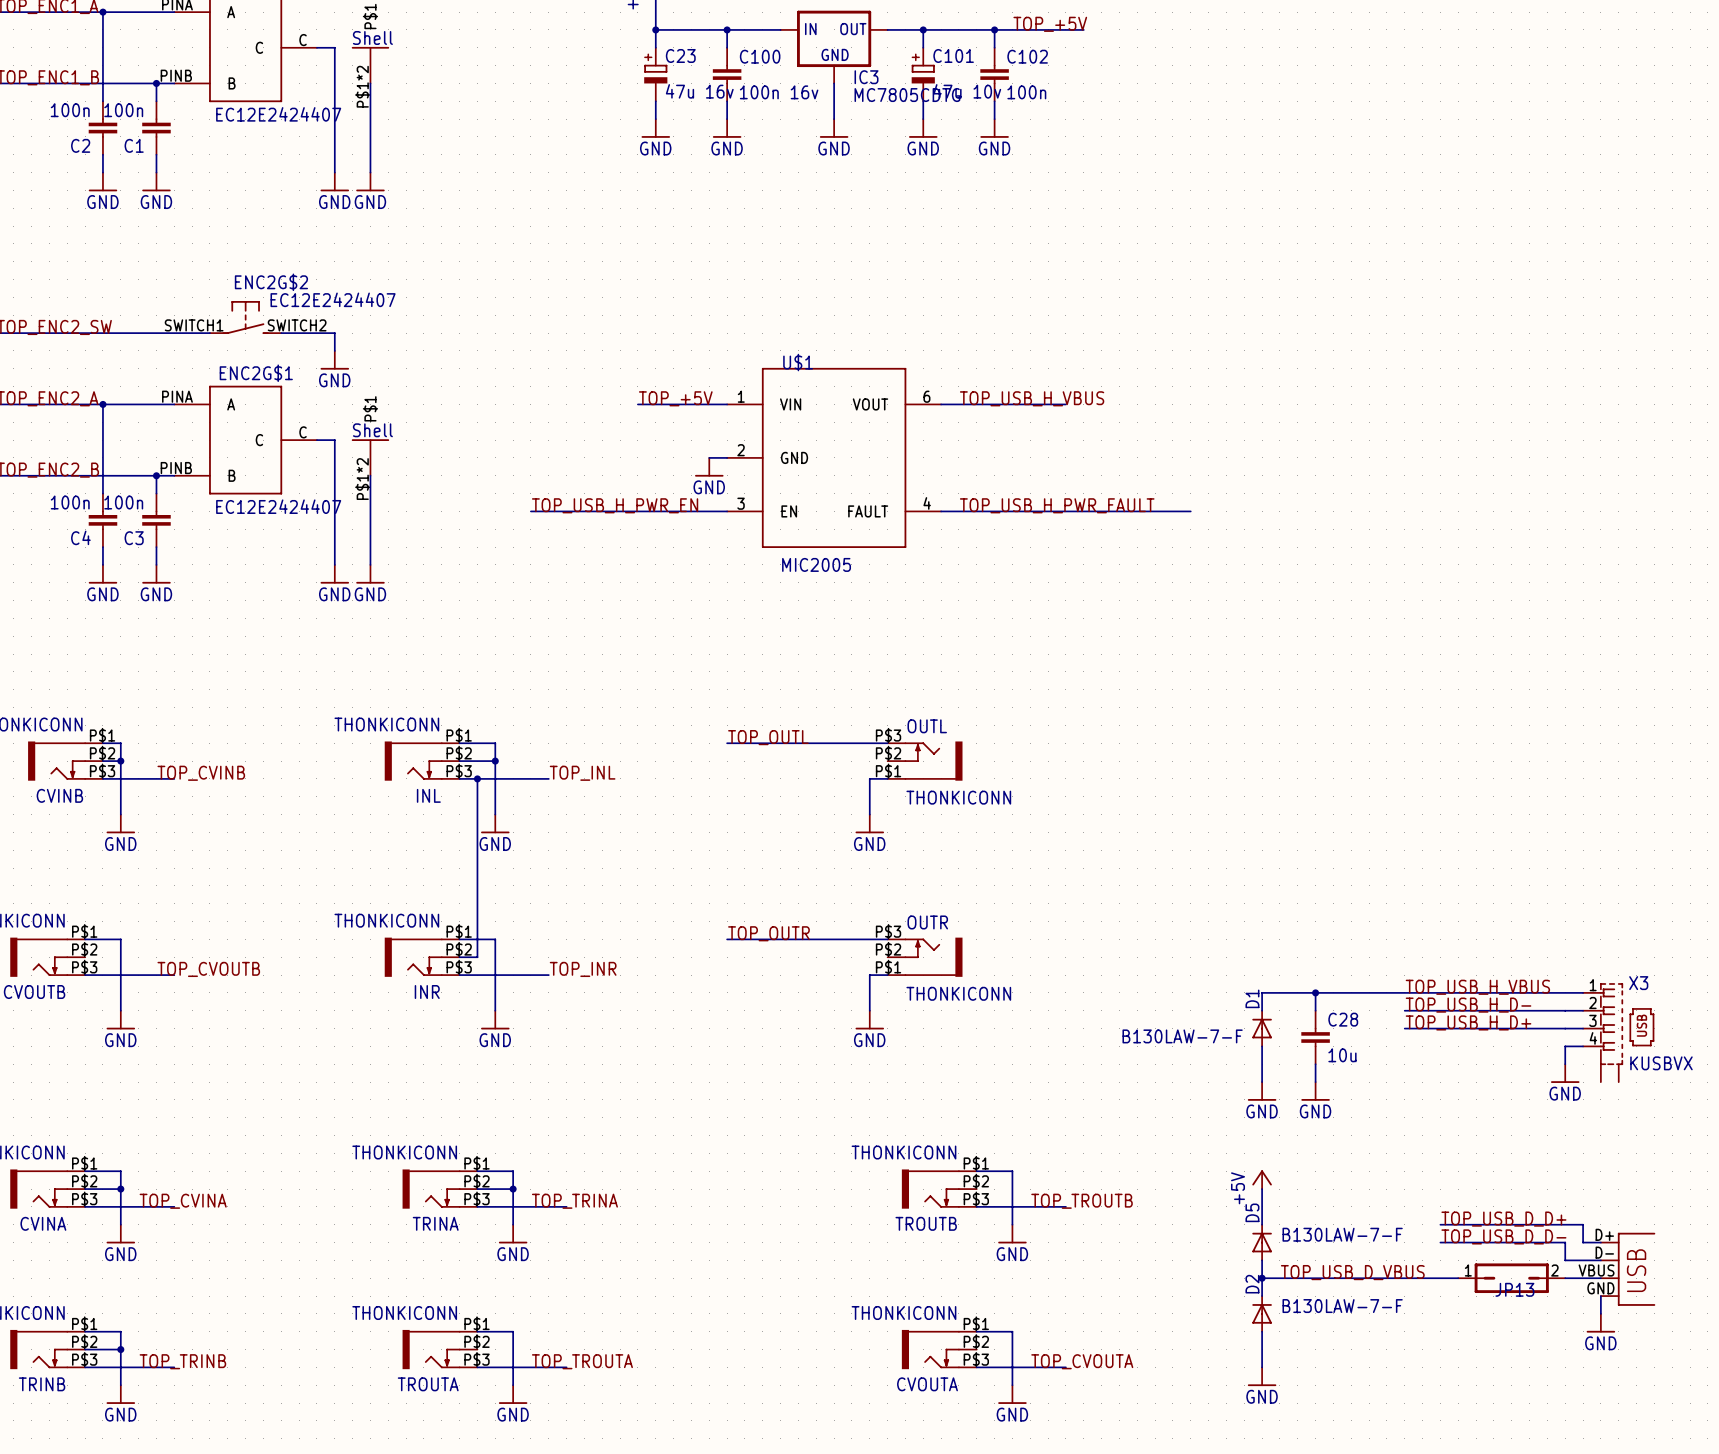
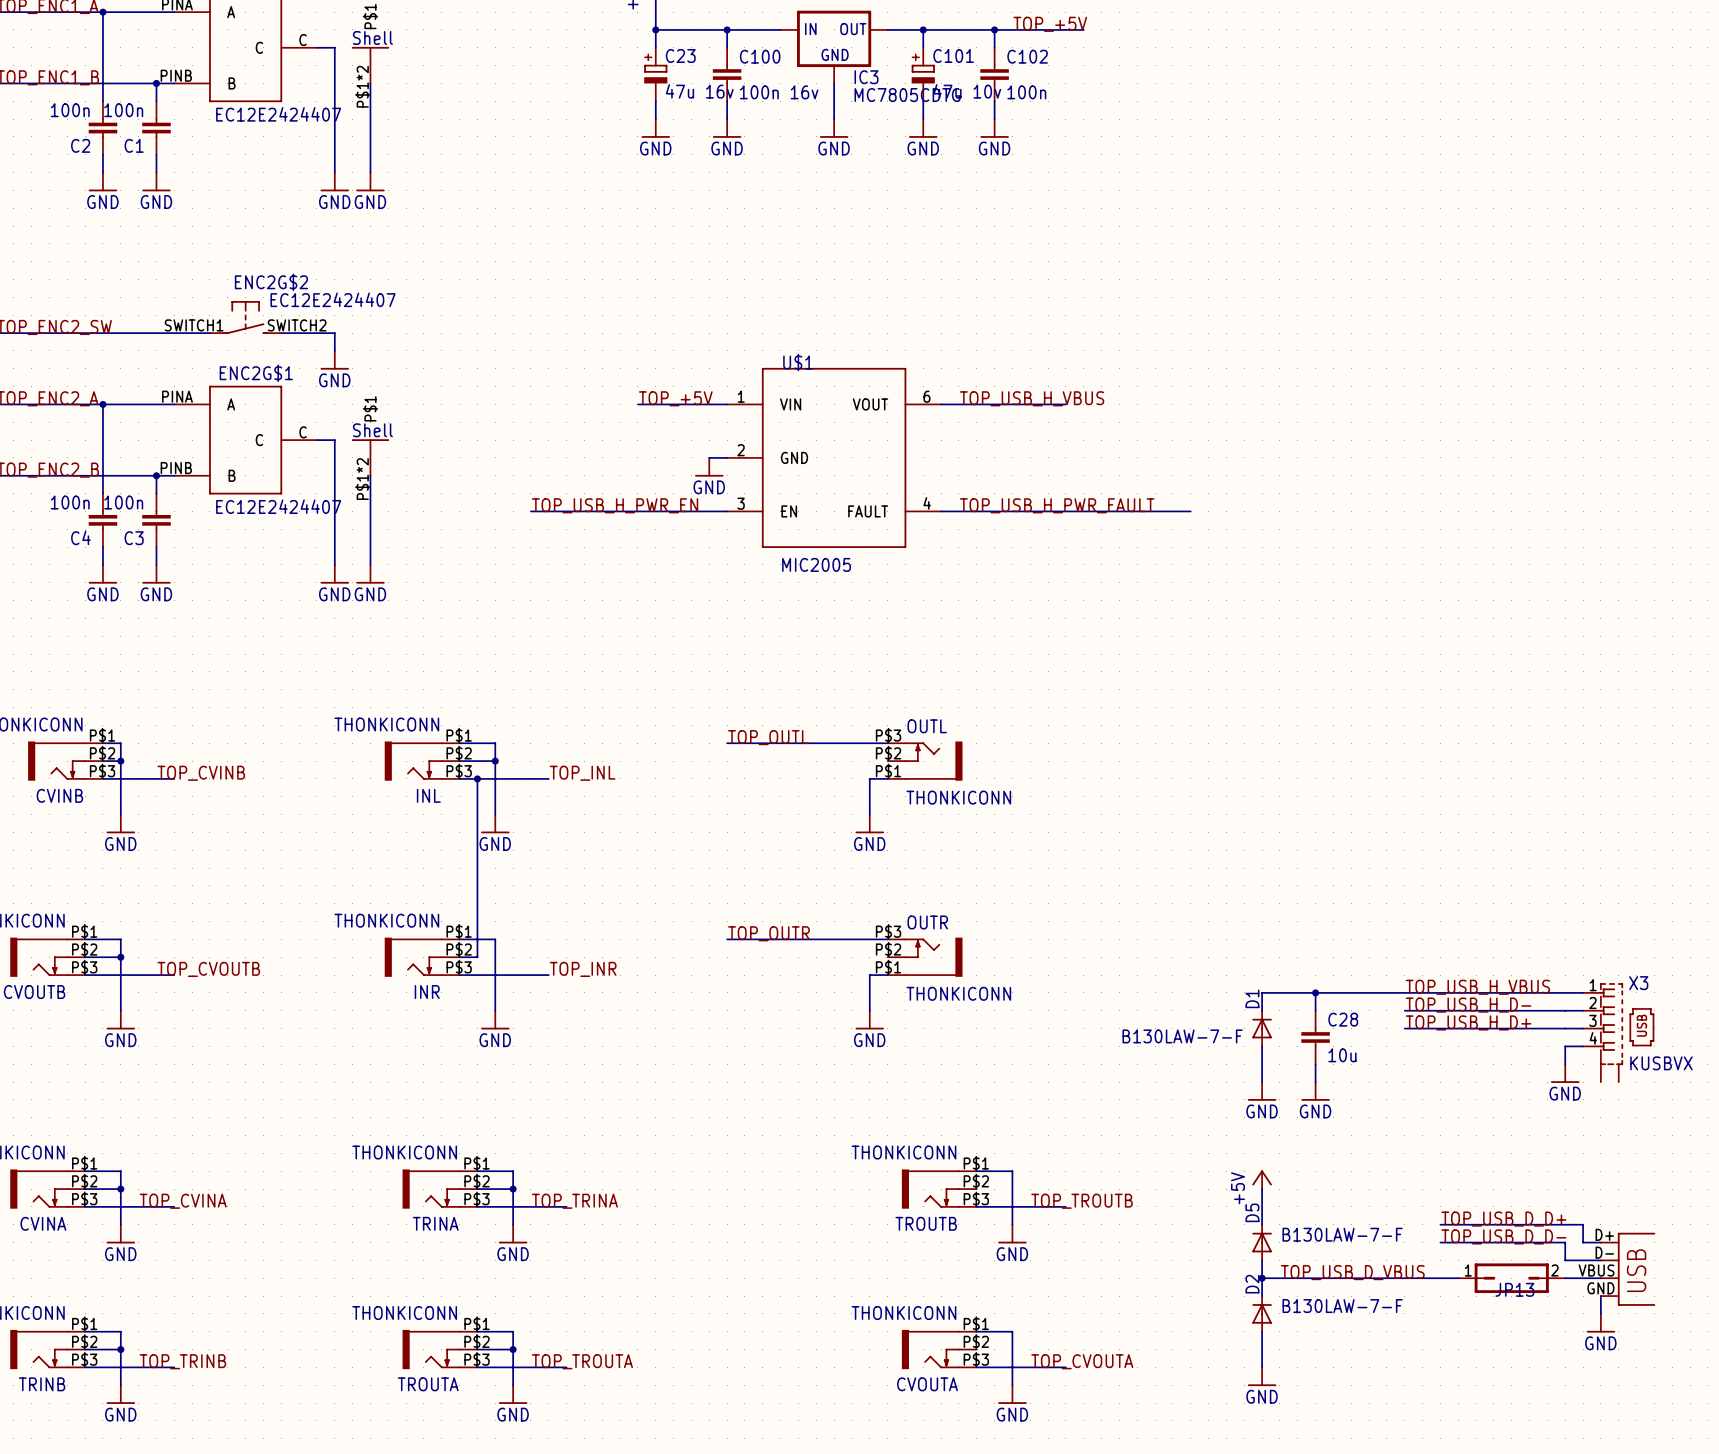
wire: none -> (85, 957) (120, 957)
junction: none -> (120, 957)
wire: none -> (477, 1349) (513, 1349)
junction: none -> (513, 1349)

